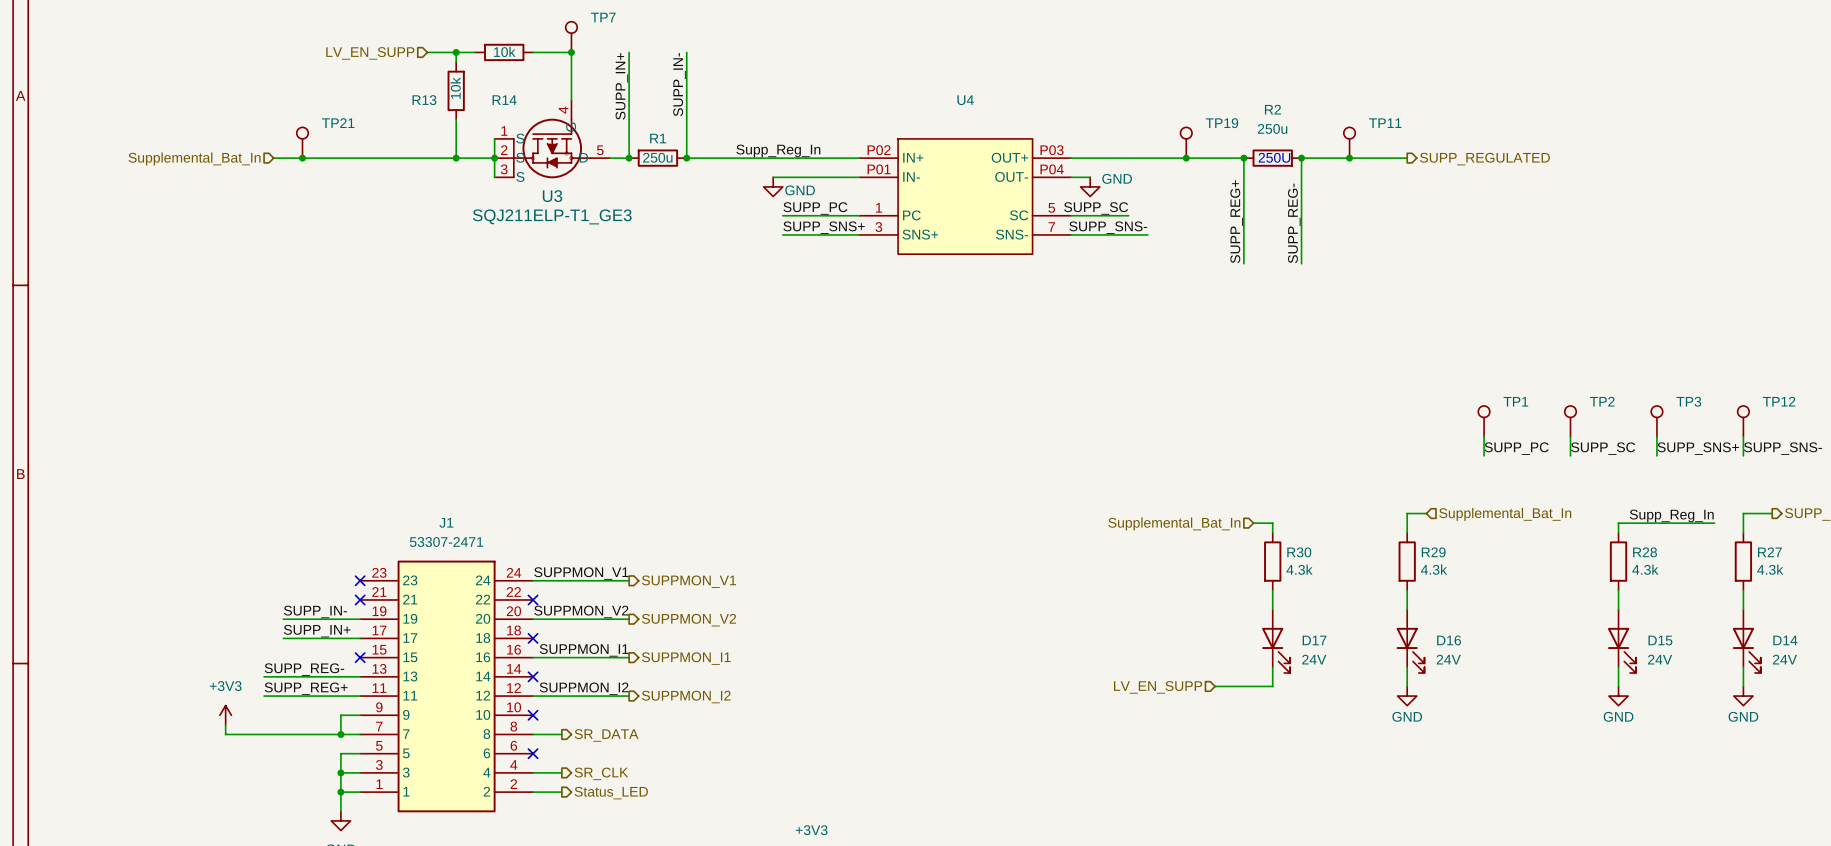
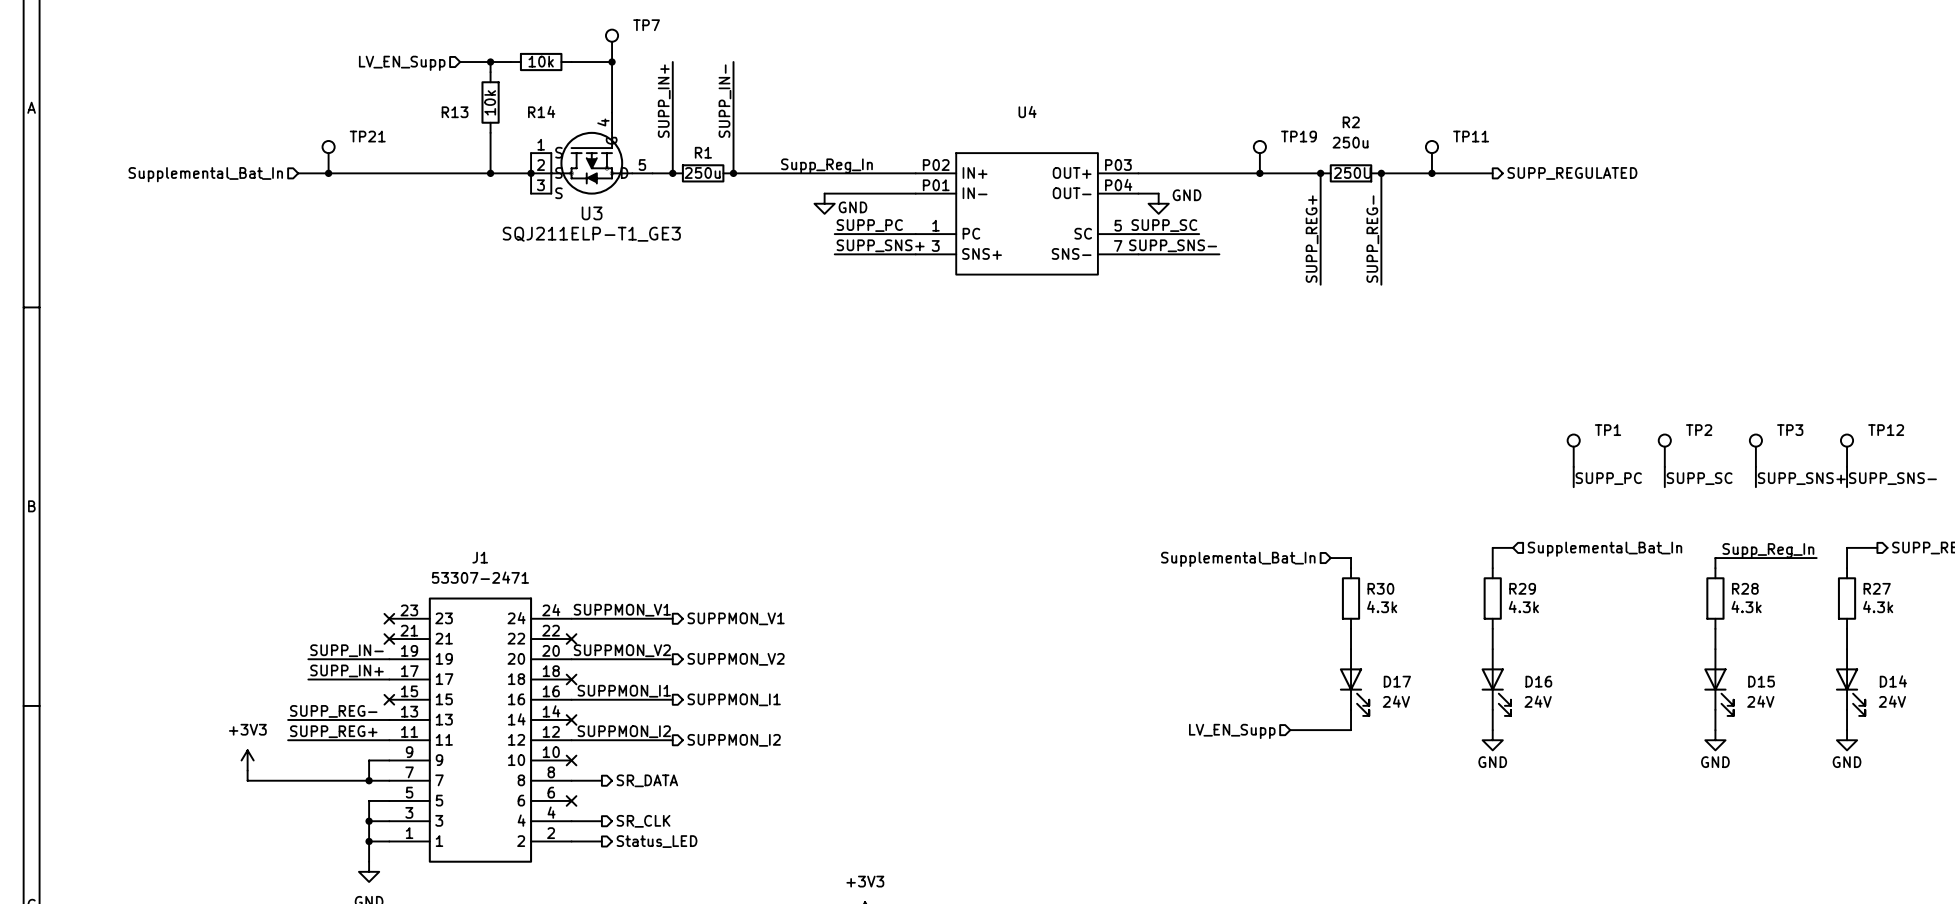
hierarchical label: LV_EN_SUPP (370, 53) -> LV_EN_Supp (402, 63)
hierarchical label: LV_EN_SUPP (1158, 687) -> LV_EN_Supp (1232, 731)

